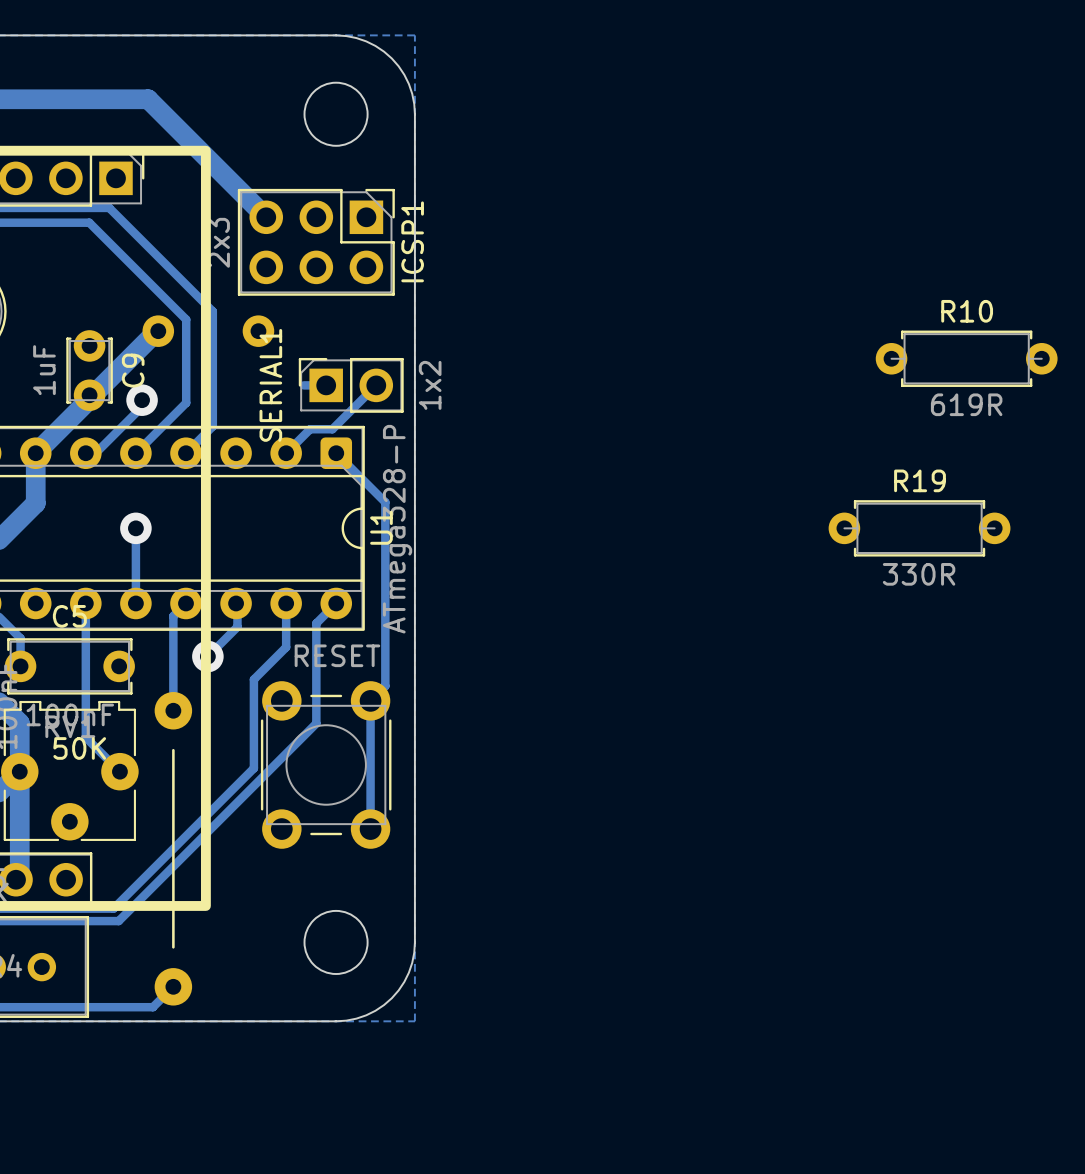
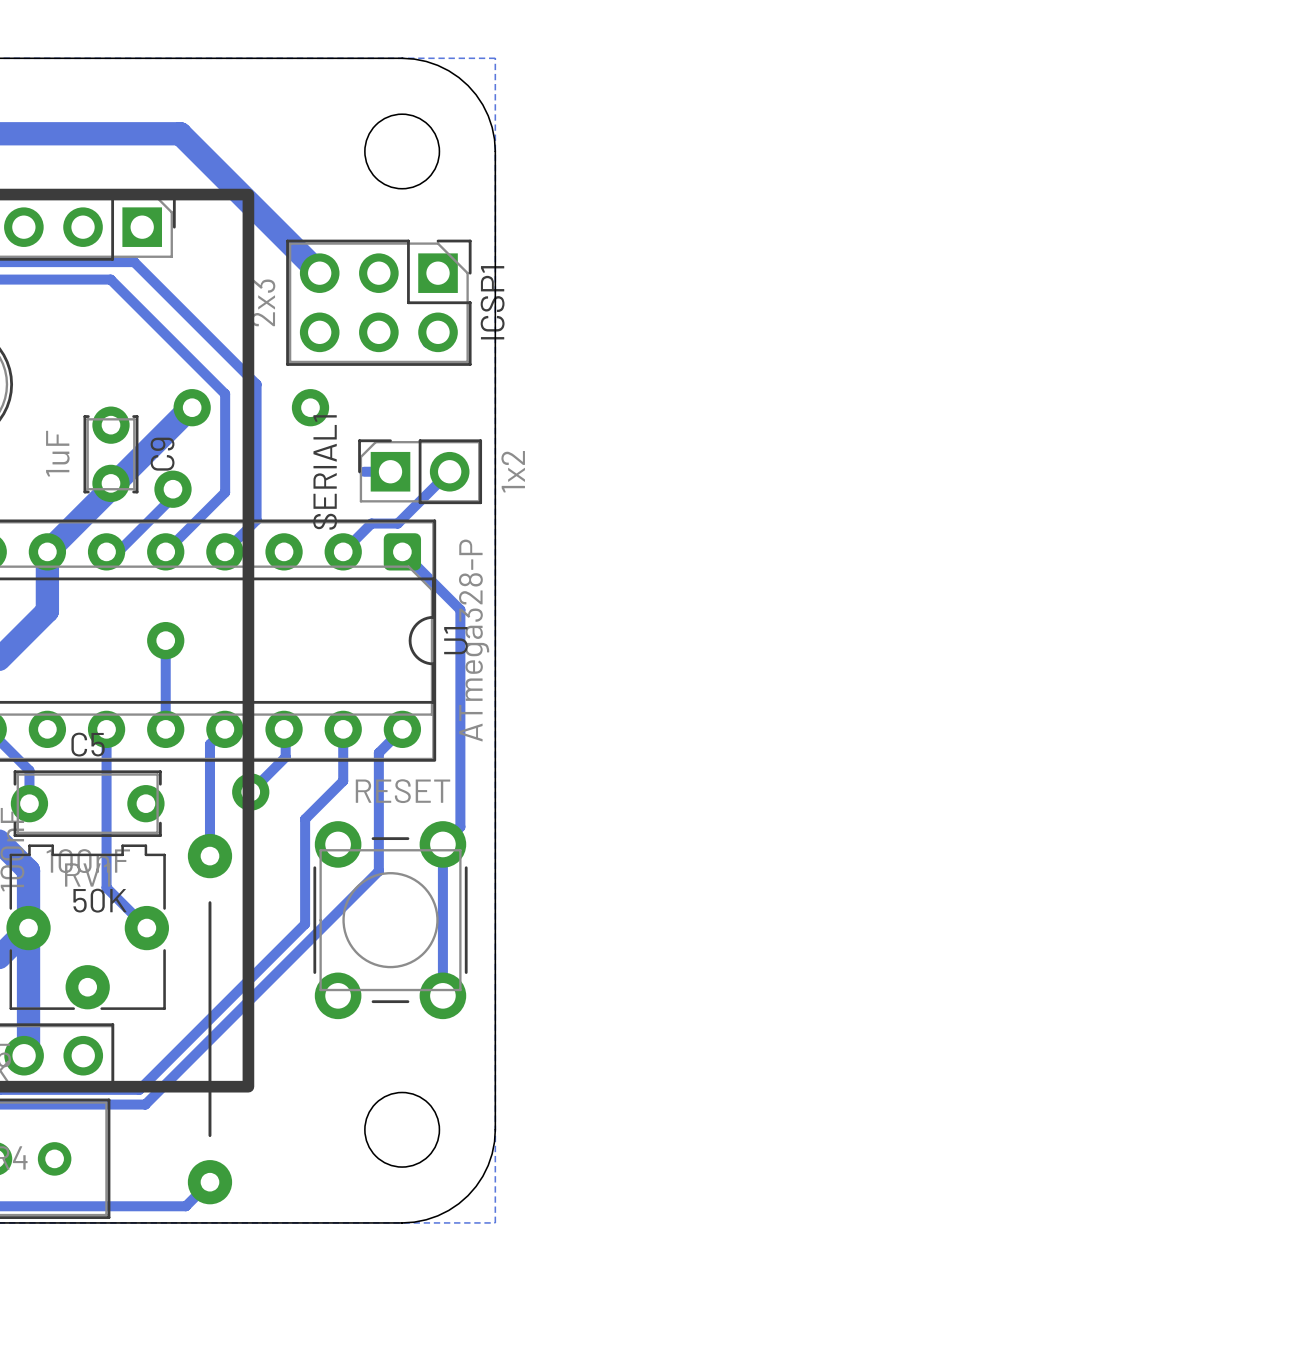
R10: 619R (966, 358) -> none
R19: 330R (919, 528) -> none

